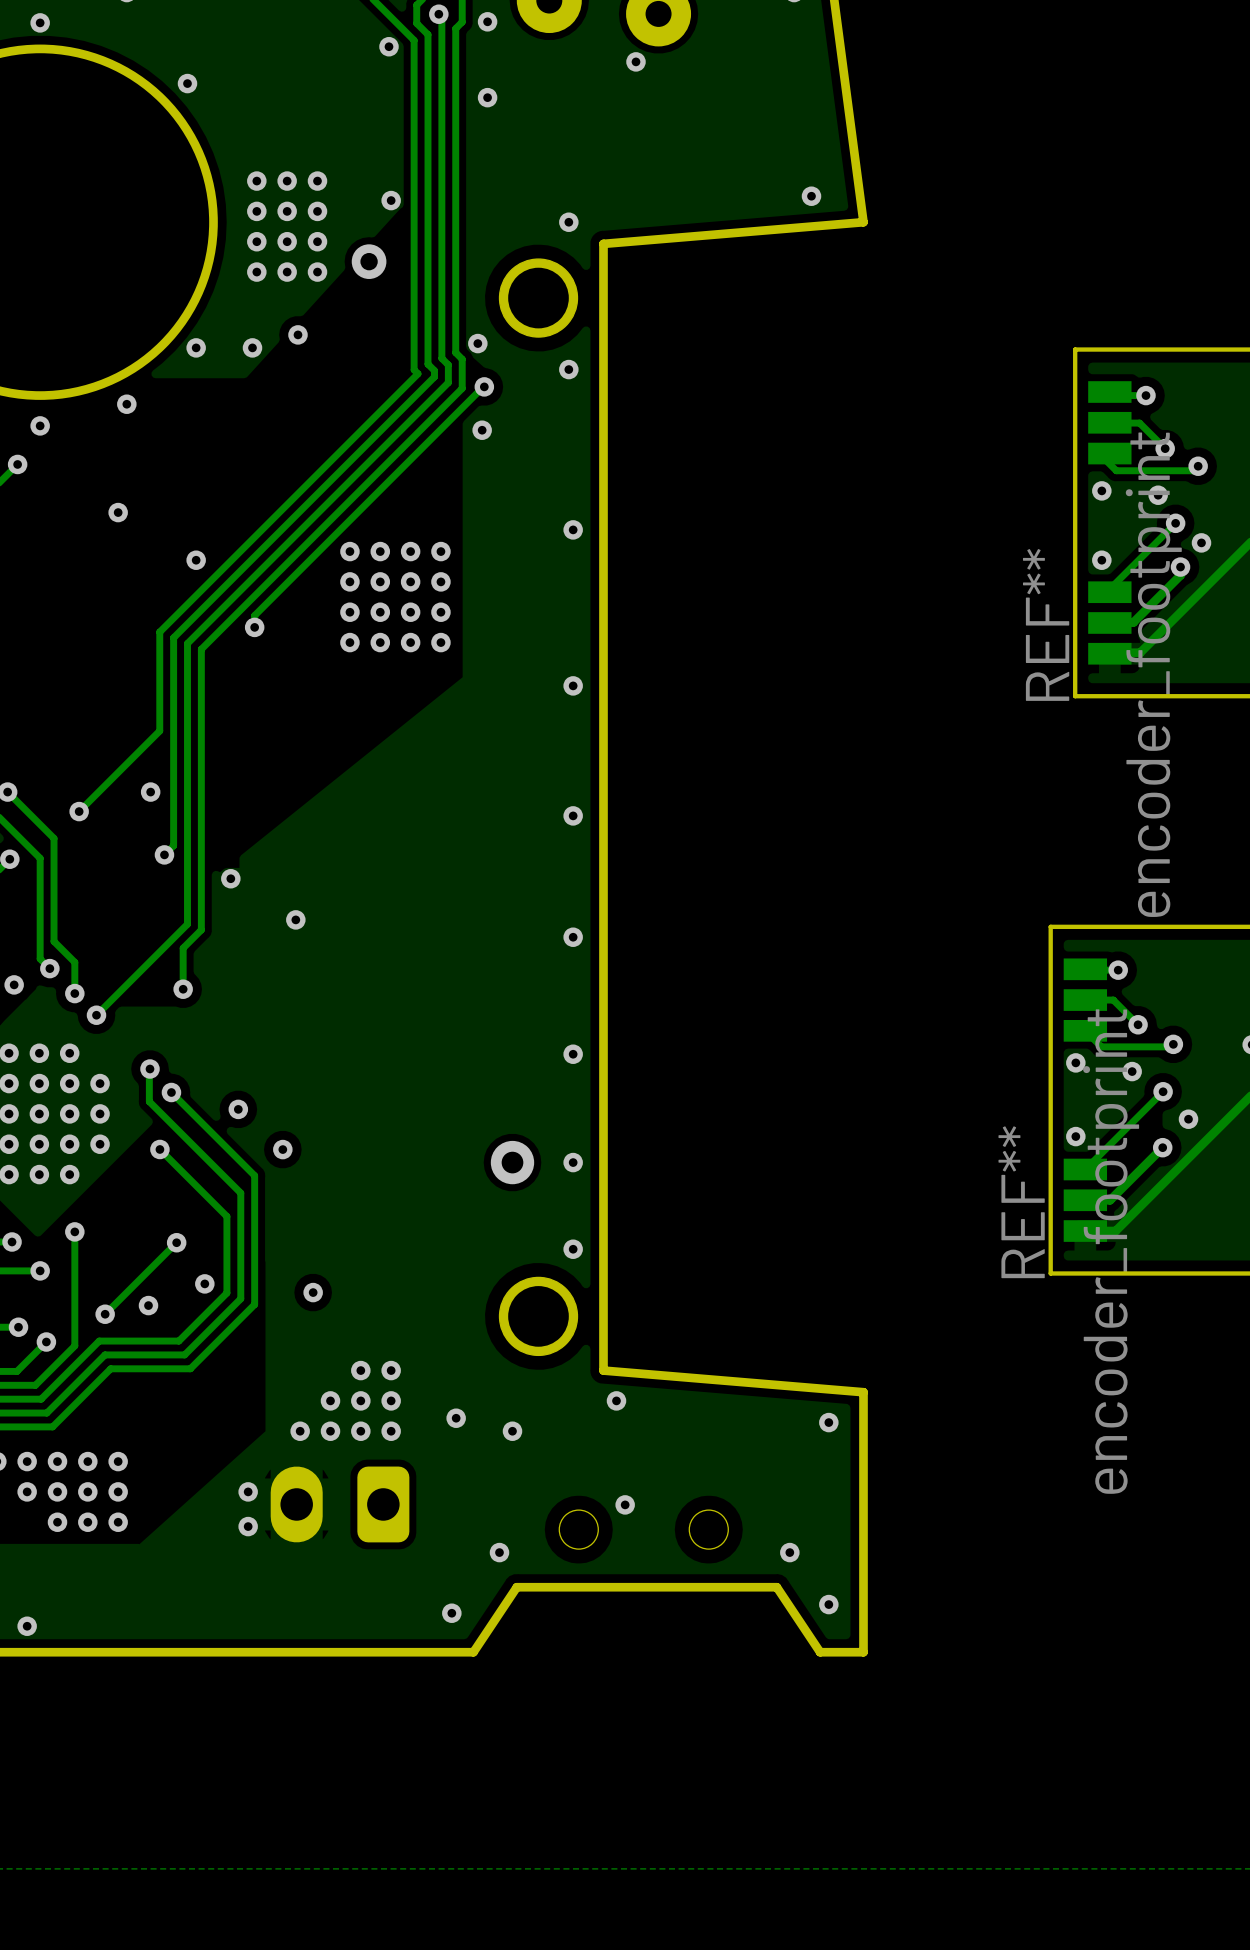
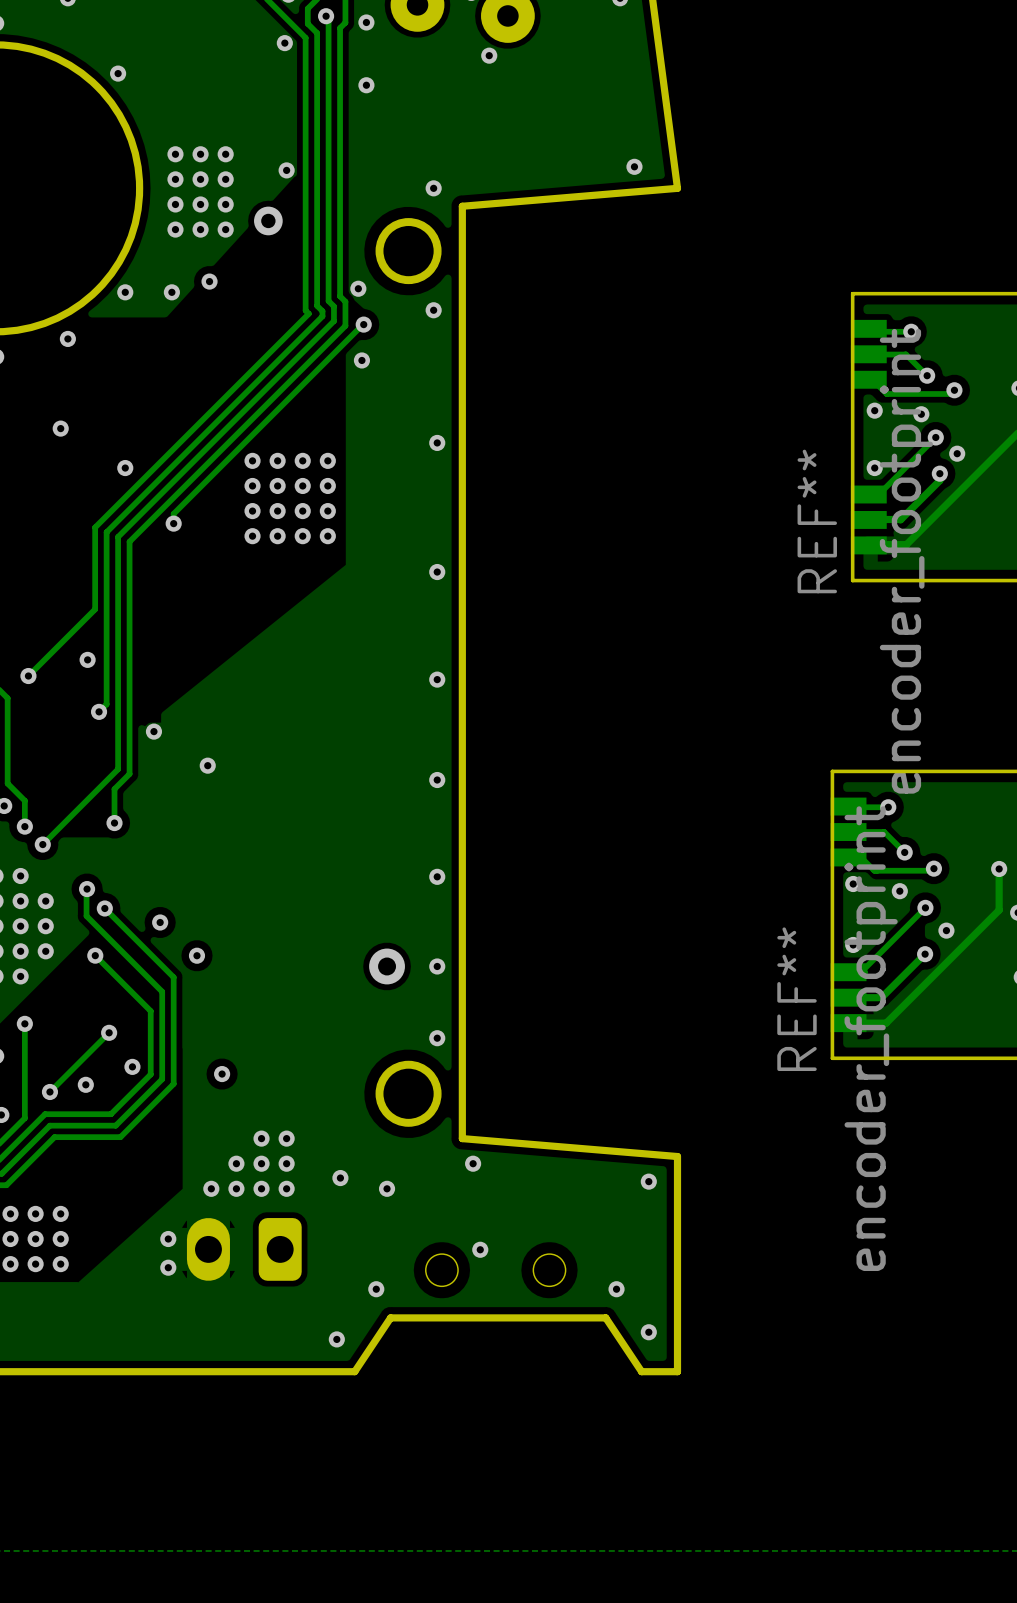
REF** position: (1109, 522) -> (868, 437)
REF** position: (1085, 1100) -> (848, 914)

